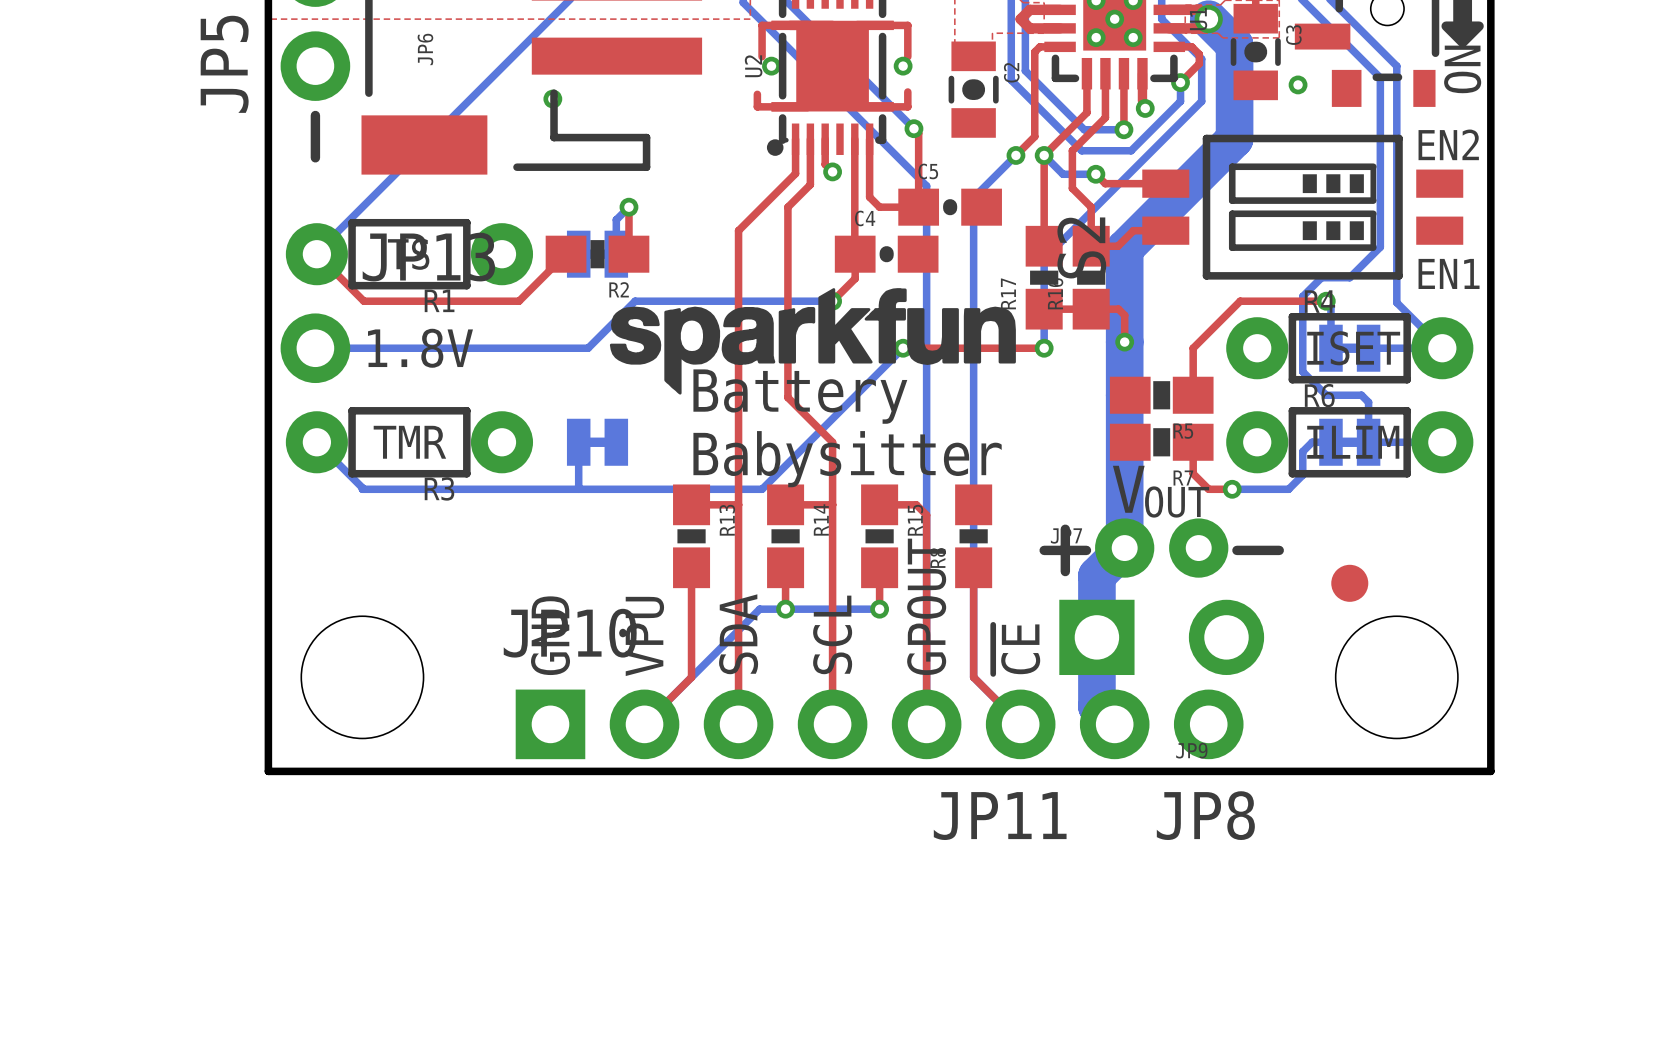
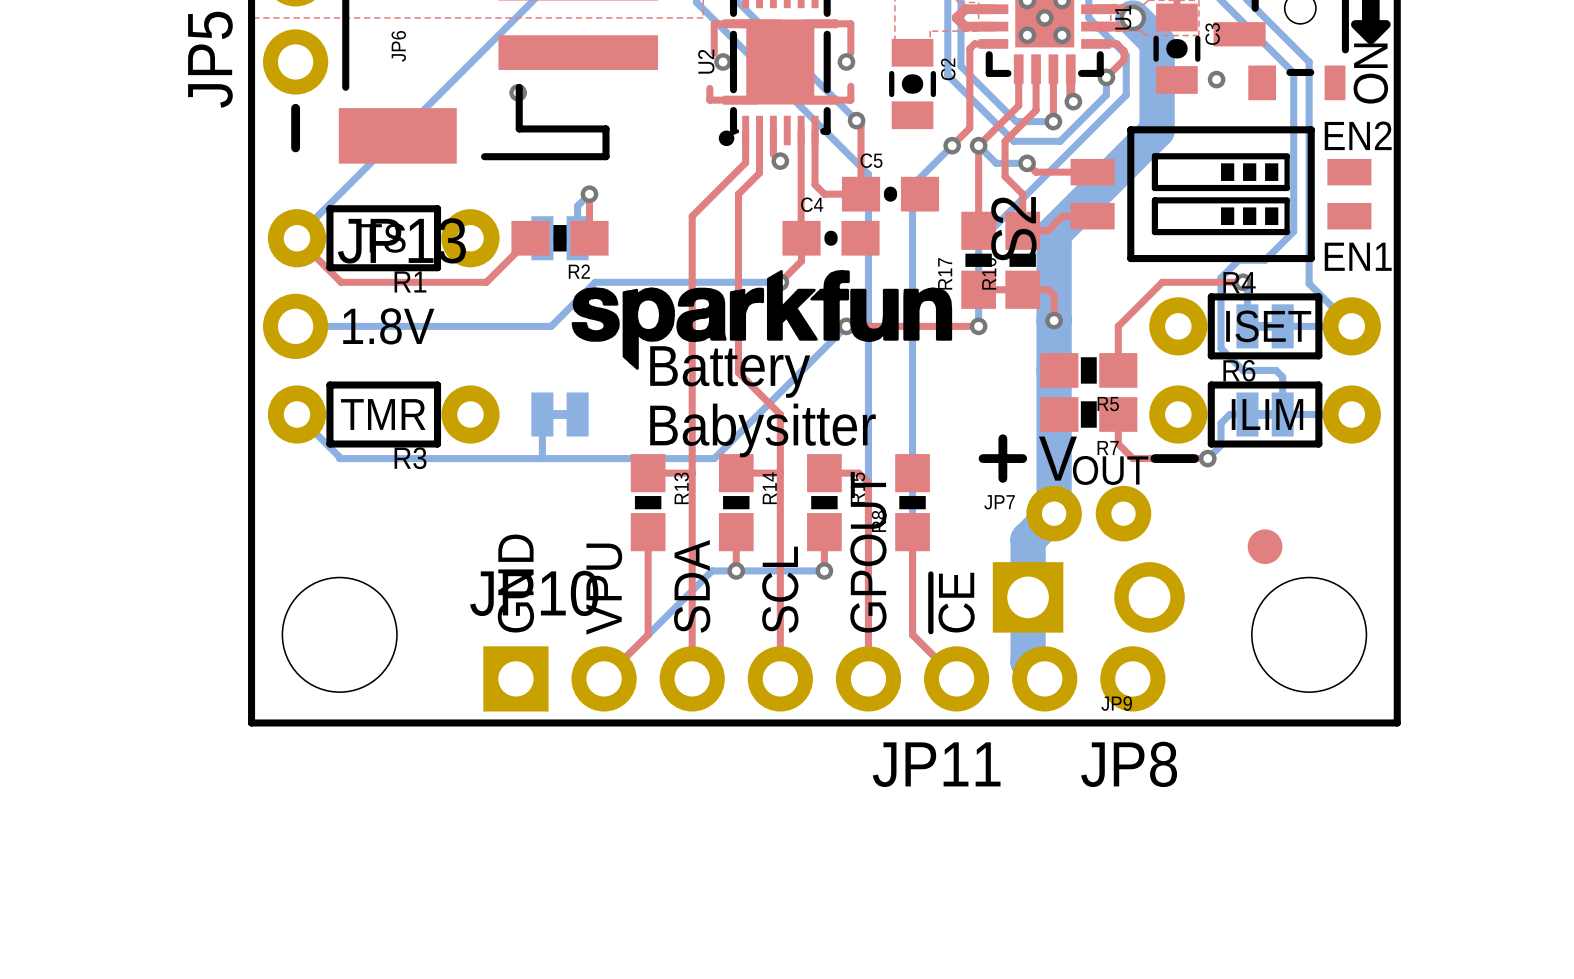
bottom track: (1232, 489) (1288, 489) -> none
via position: (1232, 489) -> (1207, 458)
line: (1065, 529) (1065, 571) -> (1002, 438) (1002, 478)
line: (1044, 550) (1086, 550) -> (983, 458) (1022, 458)
line: (1236, 550) (1279, 550) -> (1154, 458) (1194, 458)

